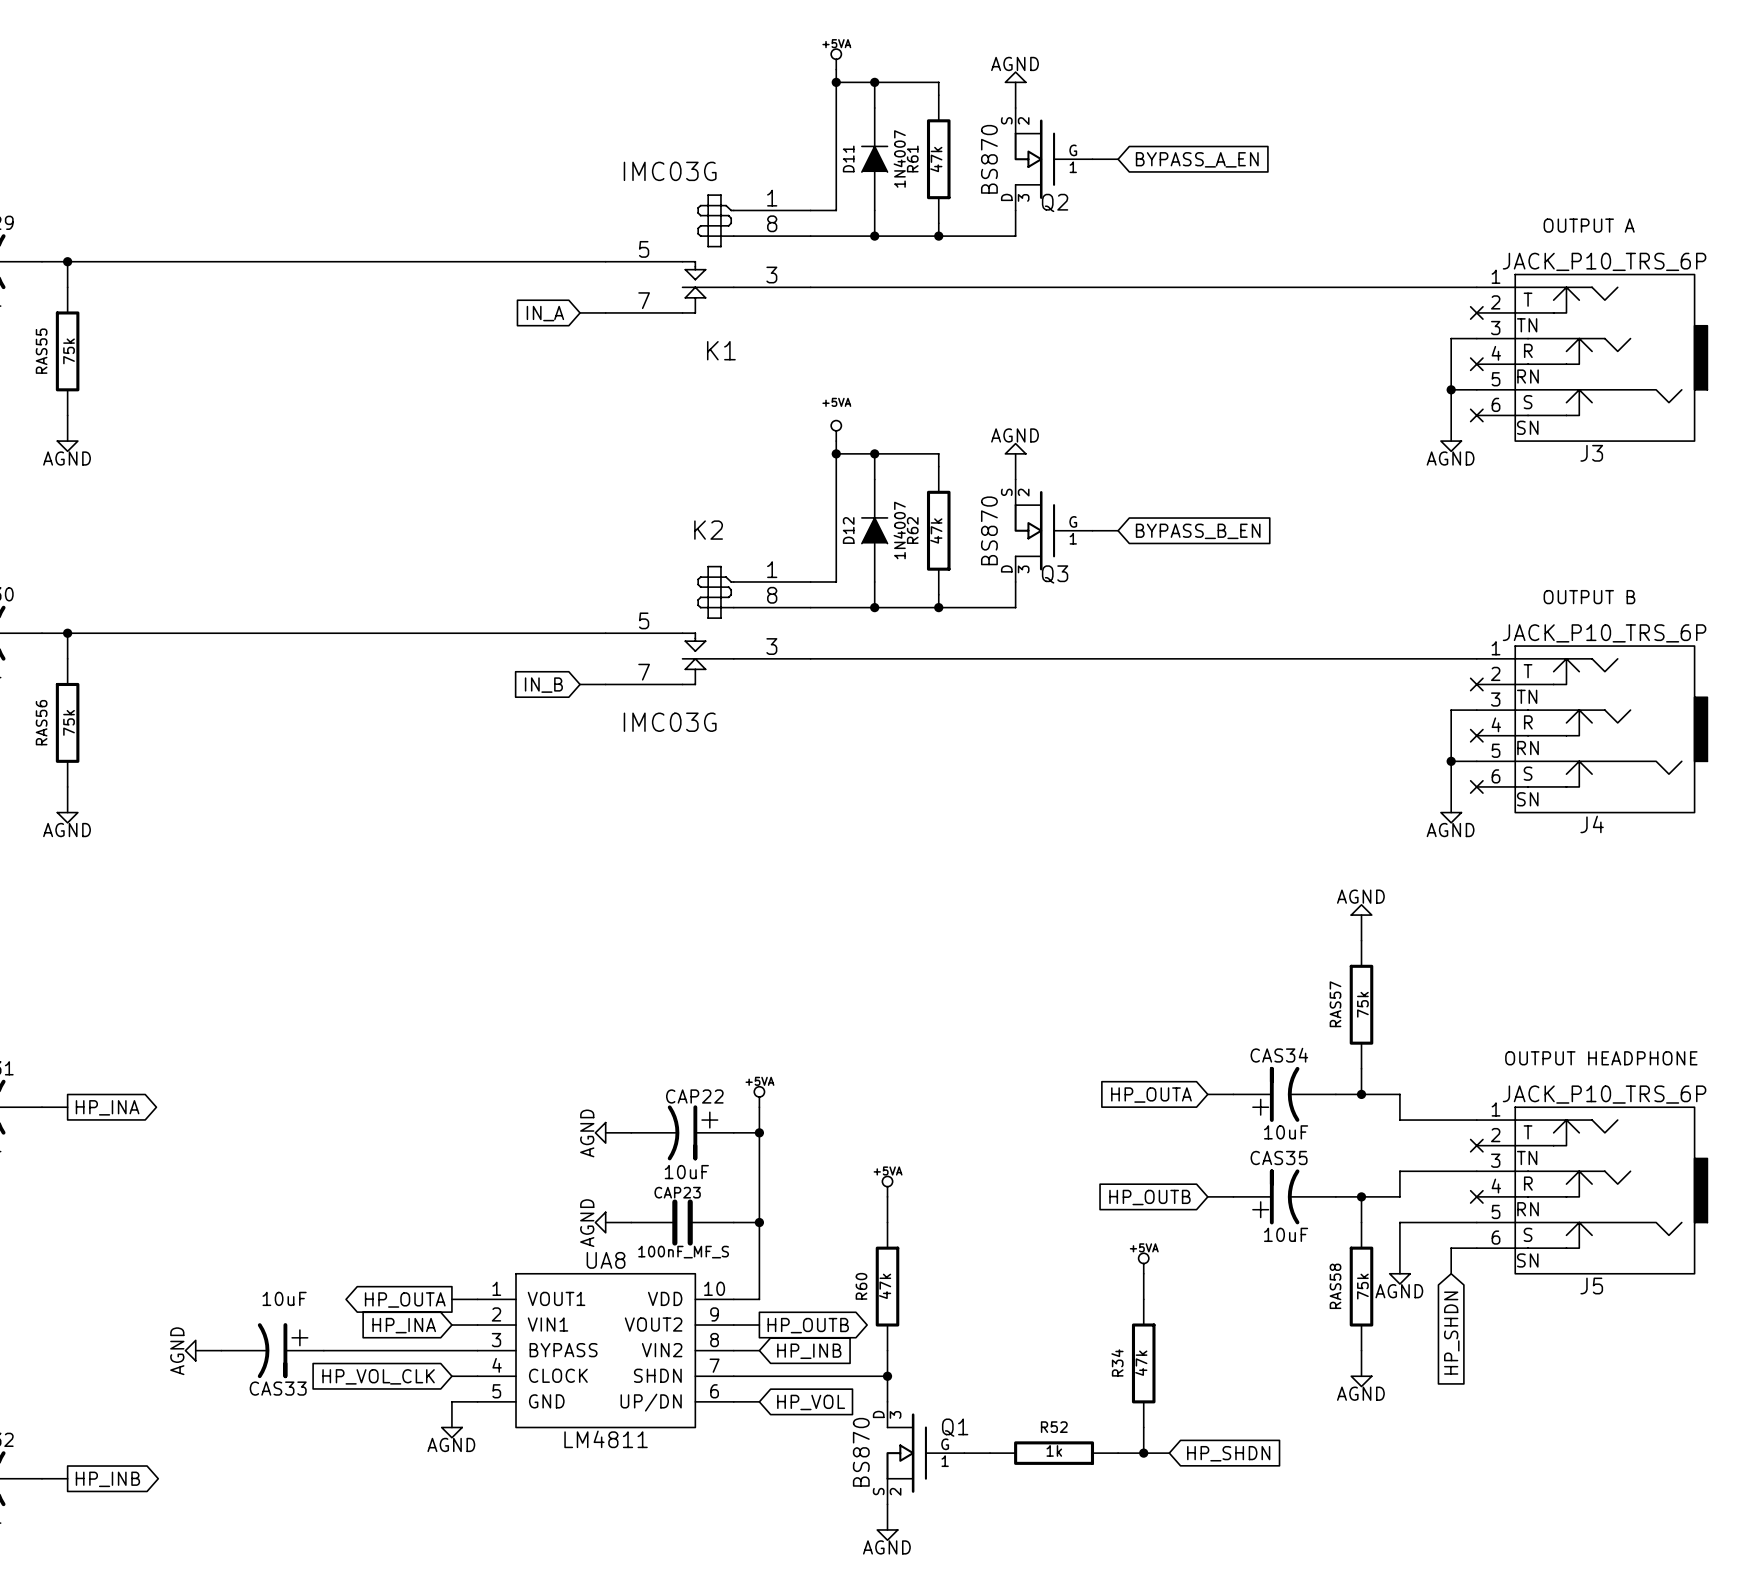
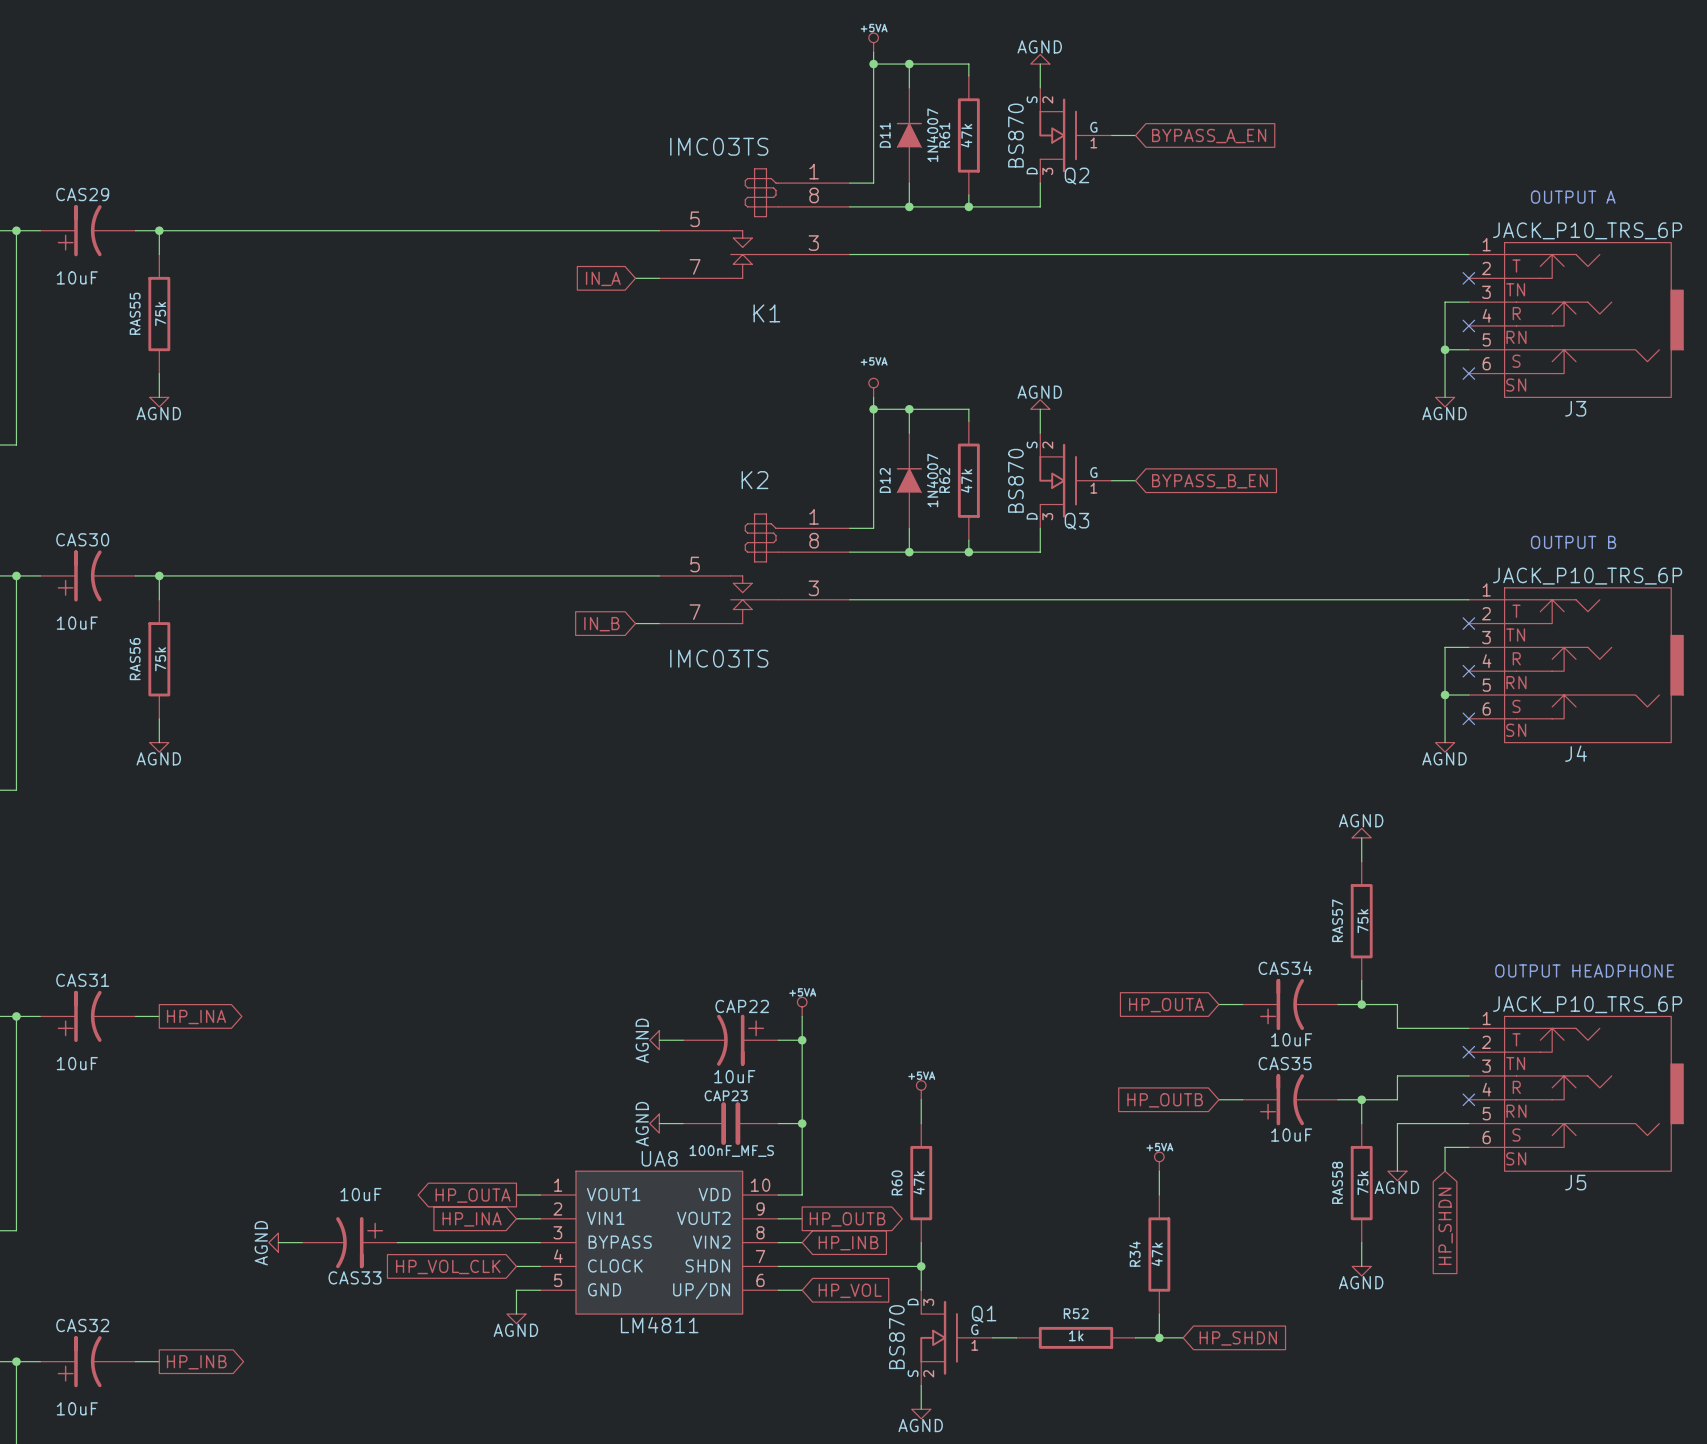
K1 value: IMC03G (670, 171) -> IMC03TS (719, 146)
K2 value: IMC03G (670, 722) -> IMC03TS (719, 658)

